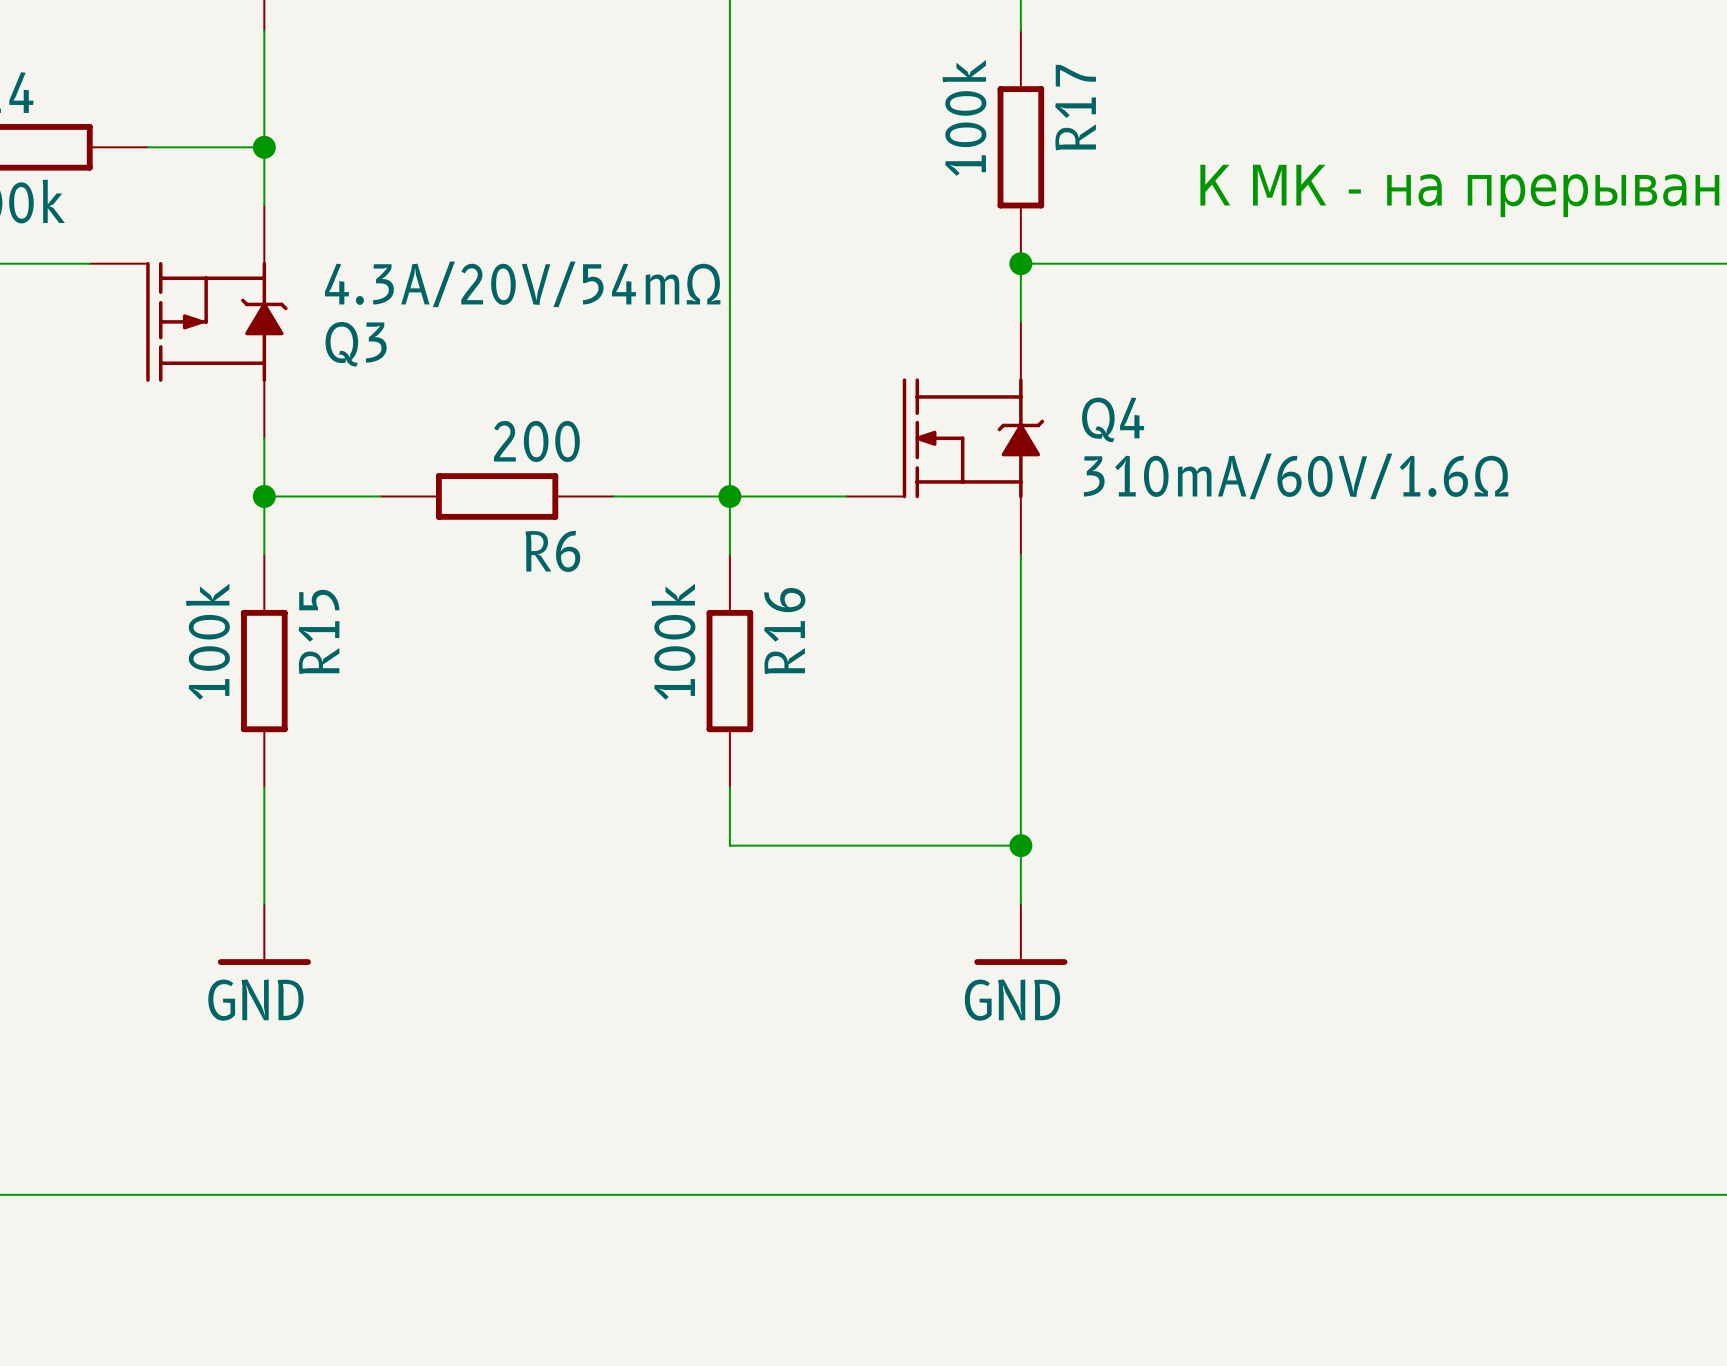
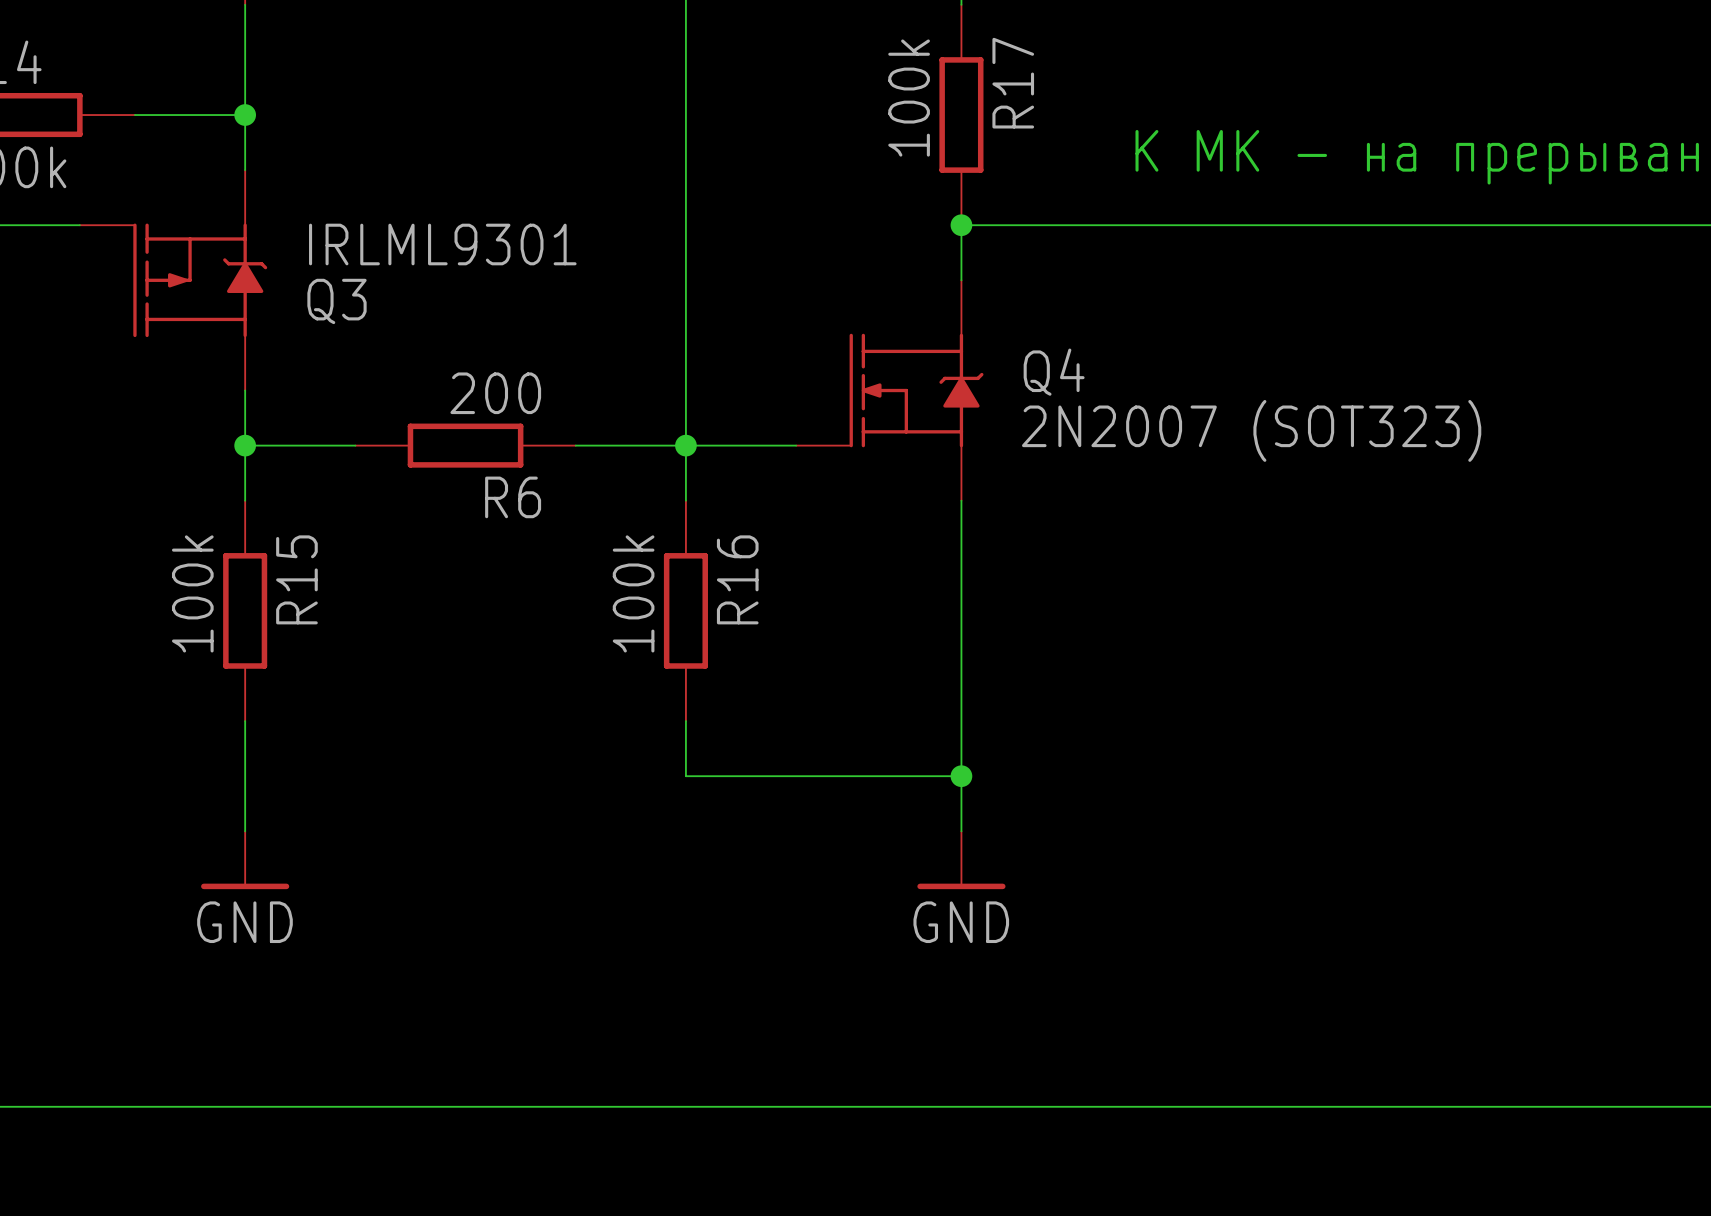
Q3 value: 4.3A/20V/54mΩ (522, 284) -> IRLML9301 (442, 244)
Q4 value: 310mA/60V/1.6Ω (1296, 476) -> 2N2007 (SOT323) (1251, 430)

